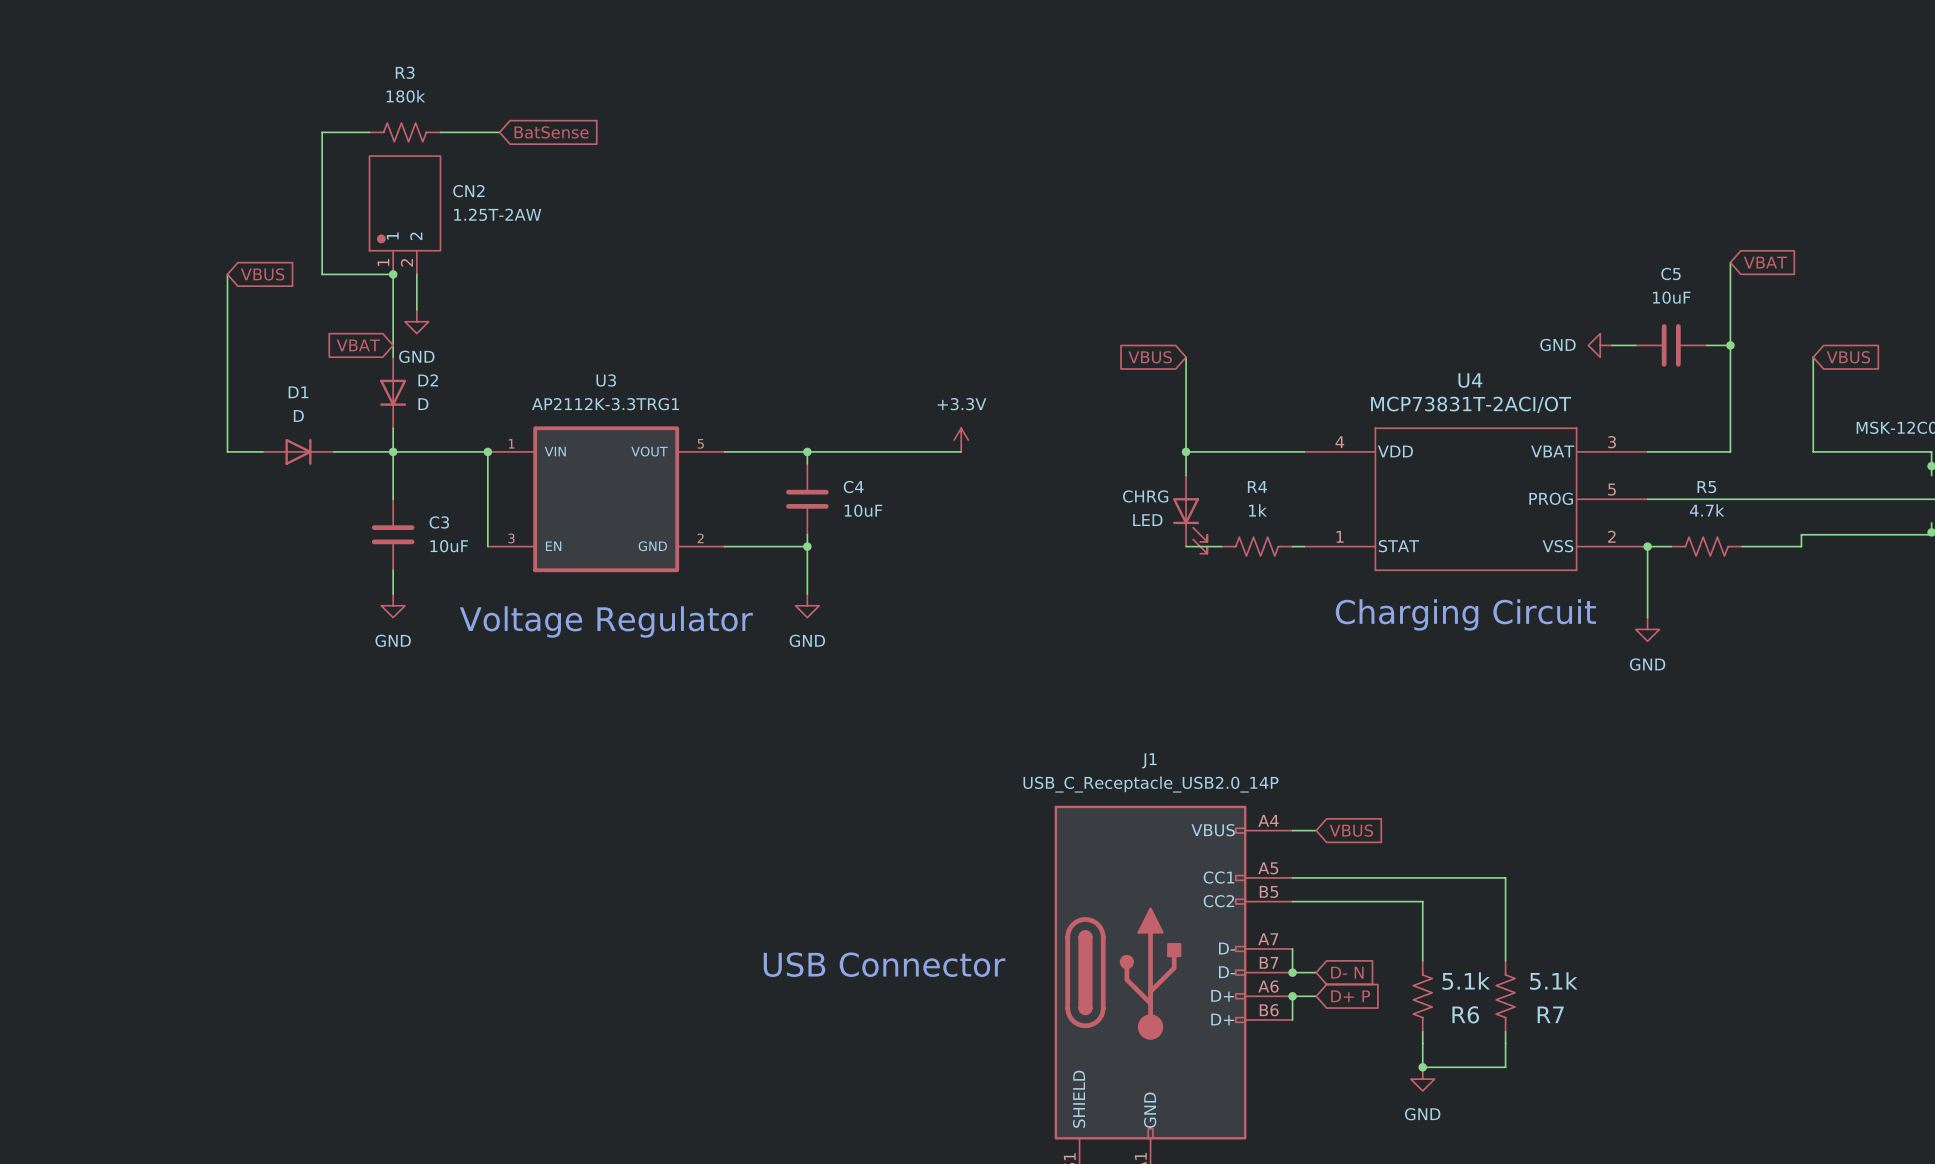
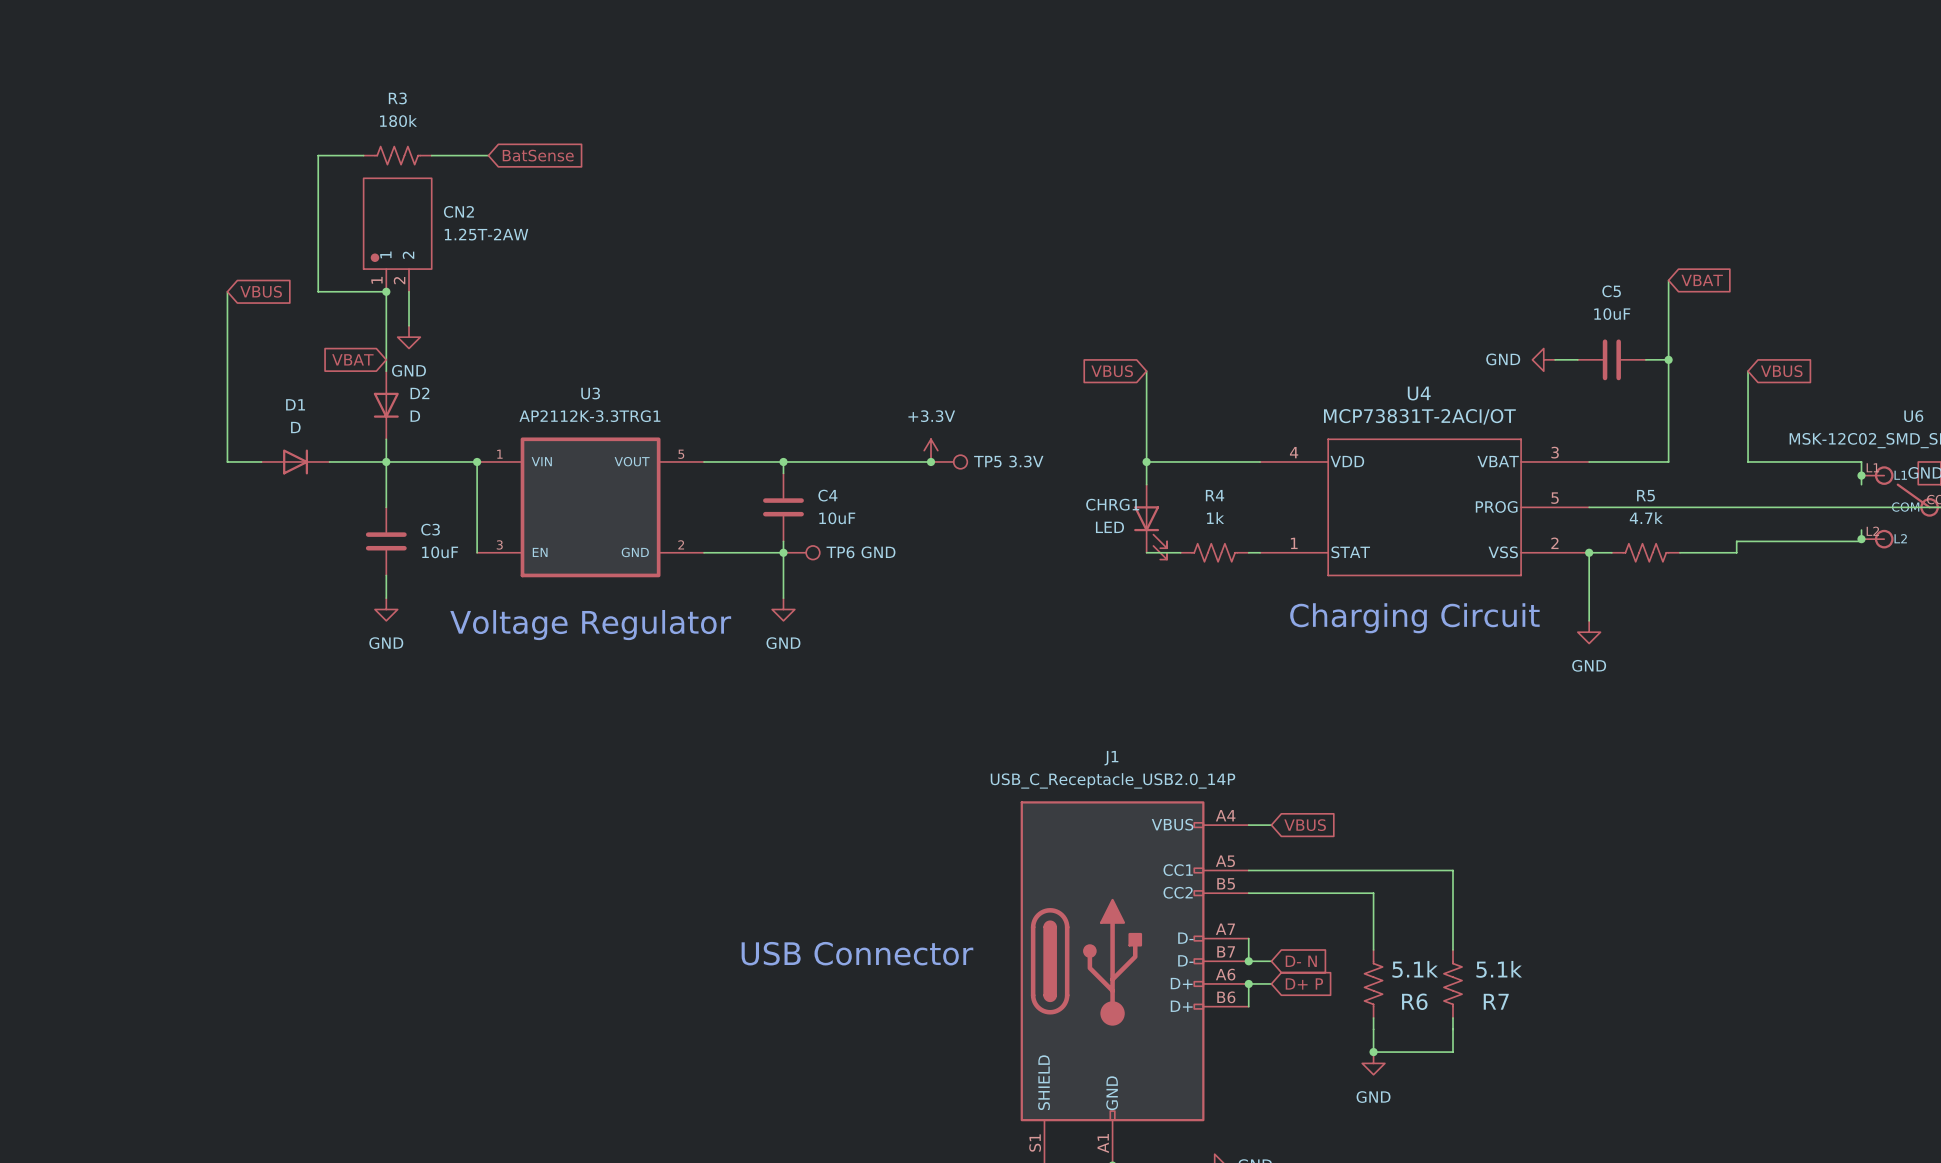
junction: none -> (931, 461)
TP5: none -> 3.3V (949, 461)
CHRG name: CHRG (1145, 496) -> CHRG1 (1112, 504)
TP6: none -> GND (801, 552)

